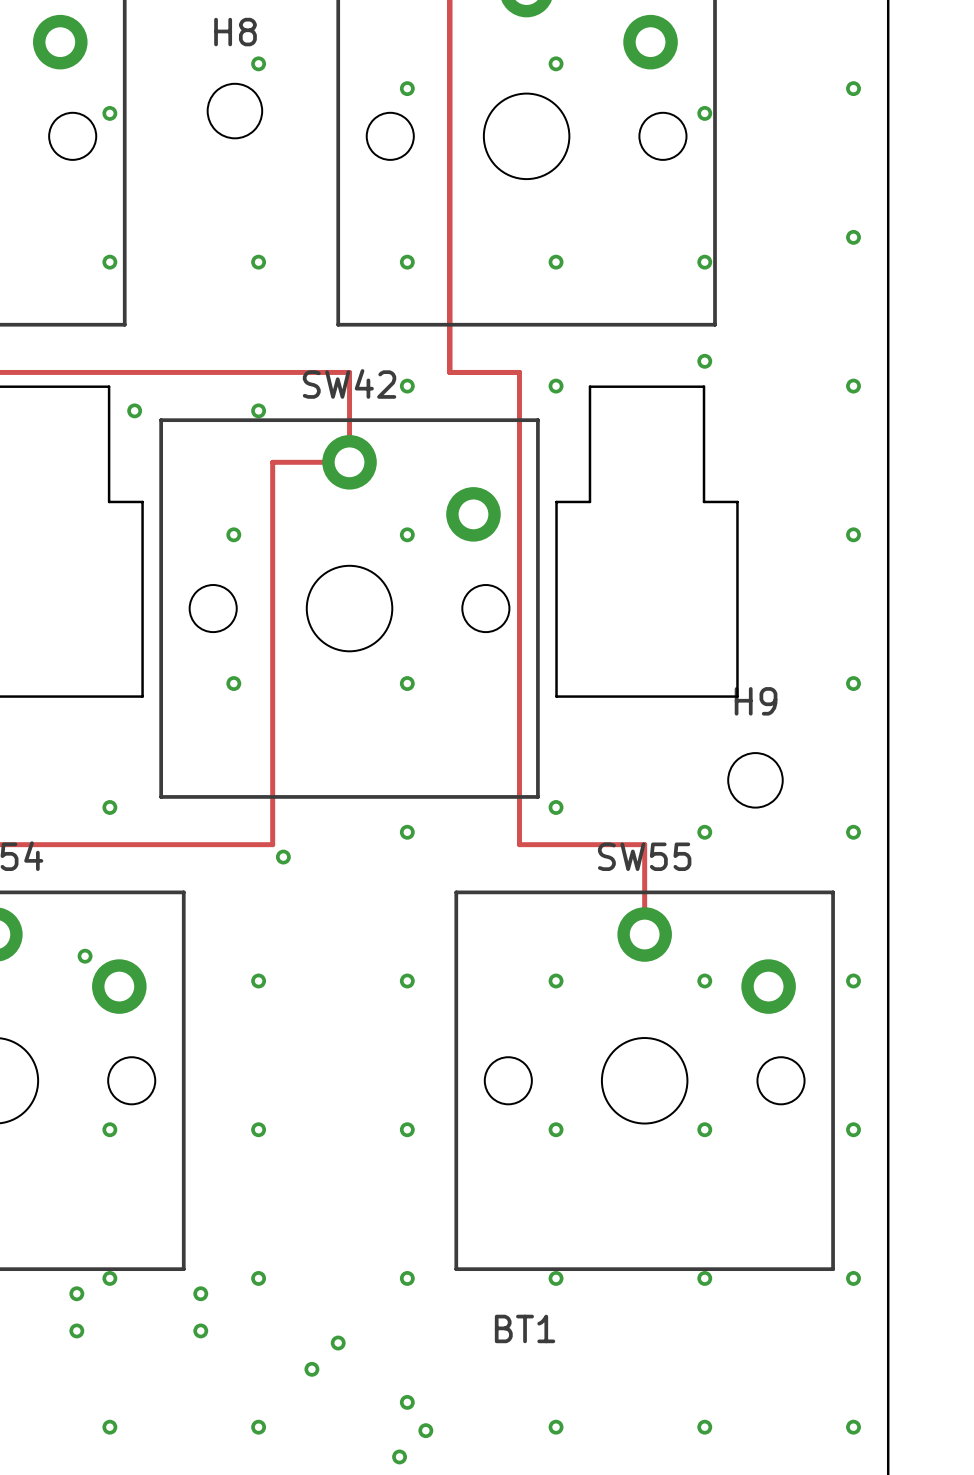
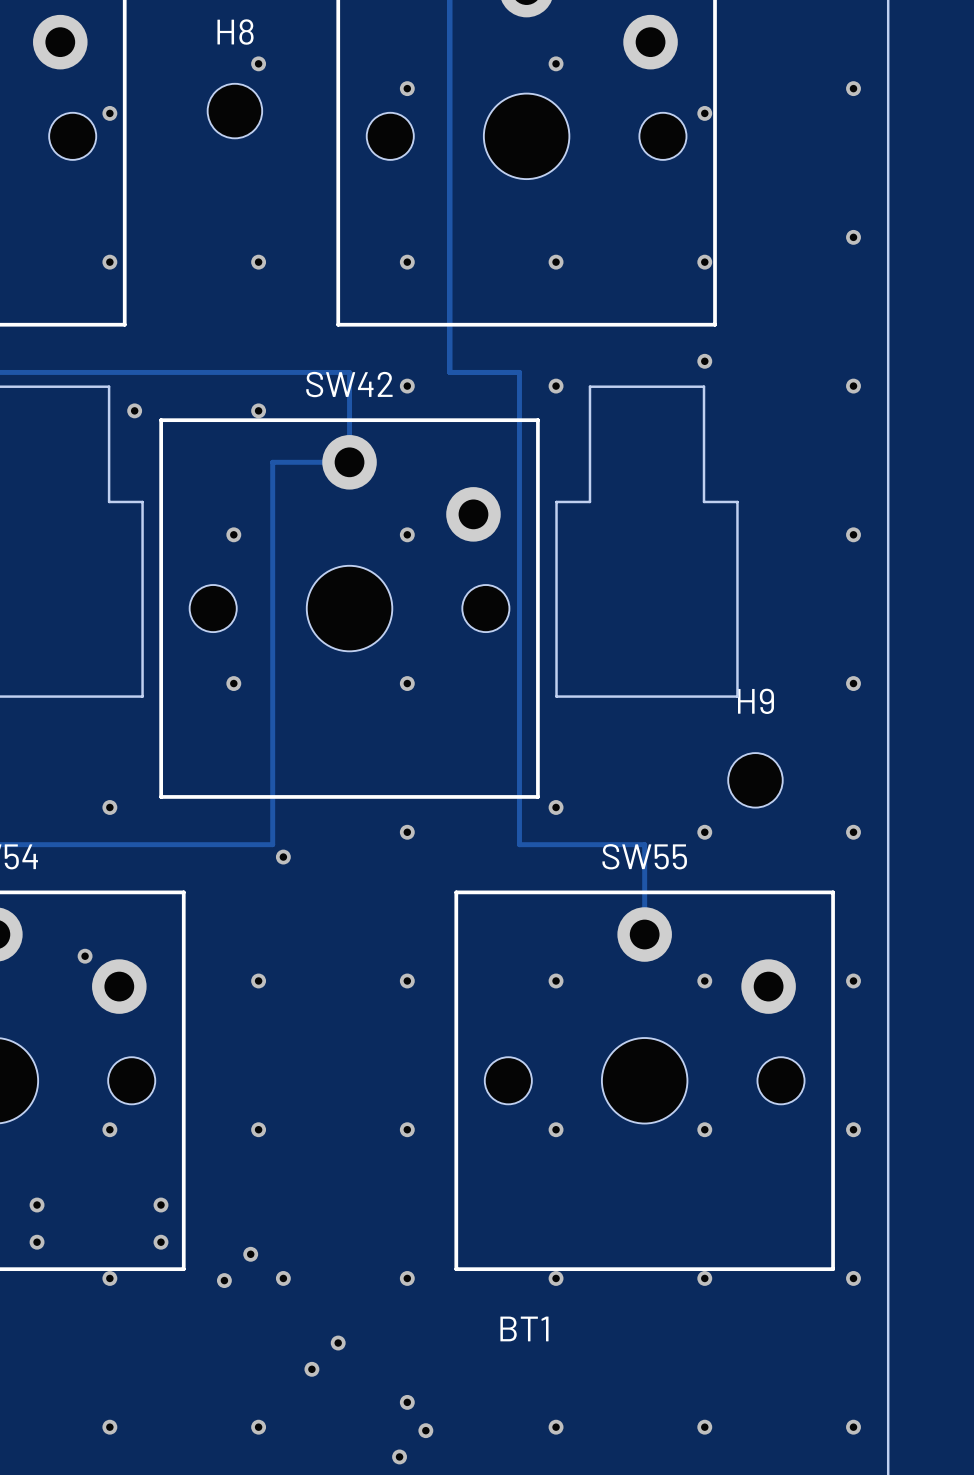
via: none -> (37, 1205)
via: none -> (160, 1205)
via: none -> (37, 1242)
via: none -> (160, 1242)
via: none -> (250, 1254)
via: (258, 1278) -> none
via: none -> (283, 1278)
via: none -> (224, 1280)
via: (76, 1293) -> none
via: (200, 1293) -> none
via: (76, 1330) -> none
via: (200, 1330) -> none

